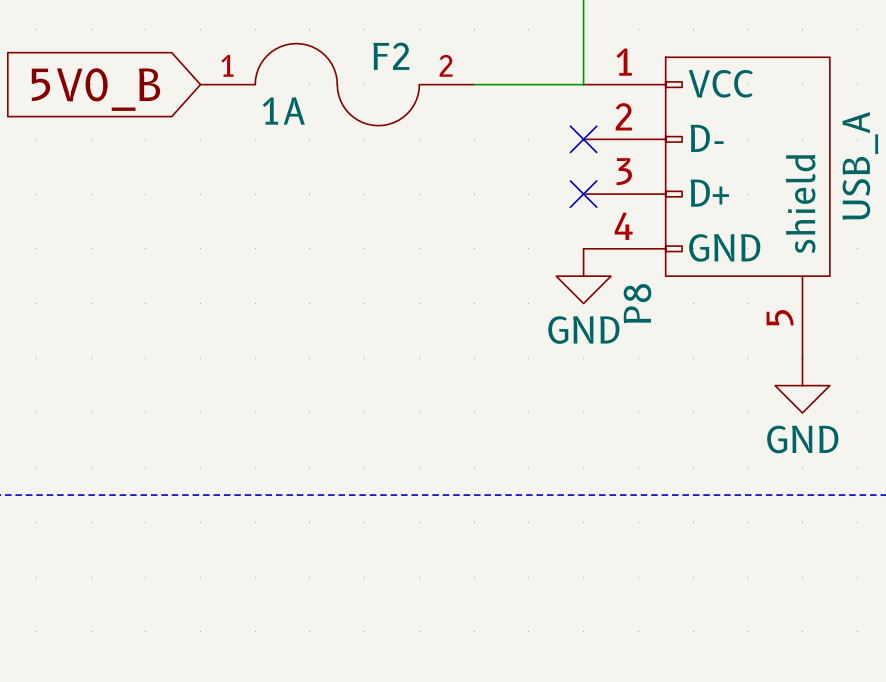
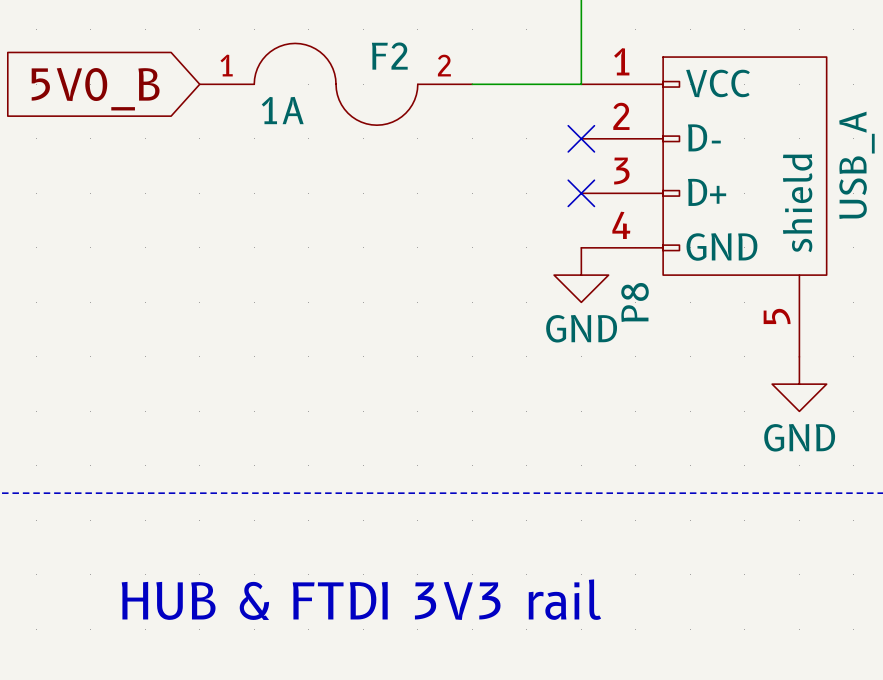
text: none -> HUB & FTDI 3V3 rail (361, 599)

